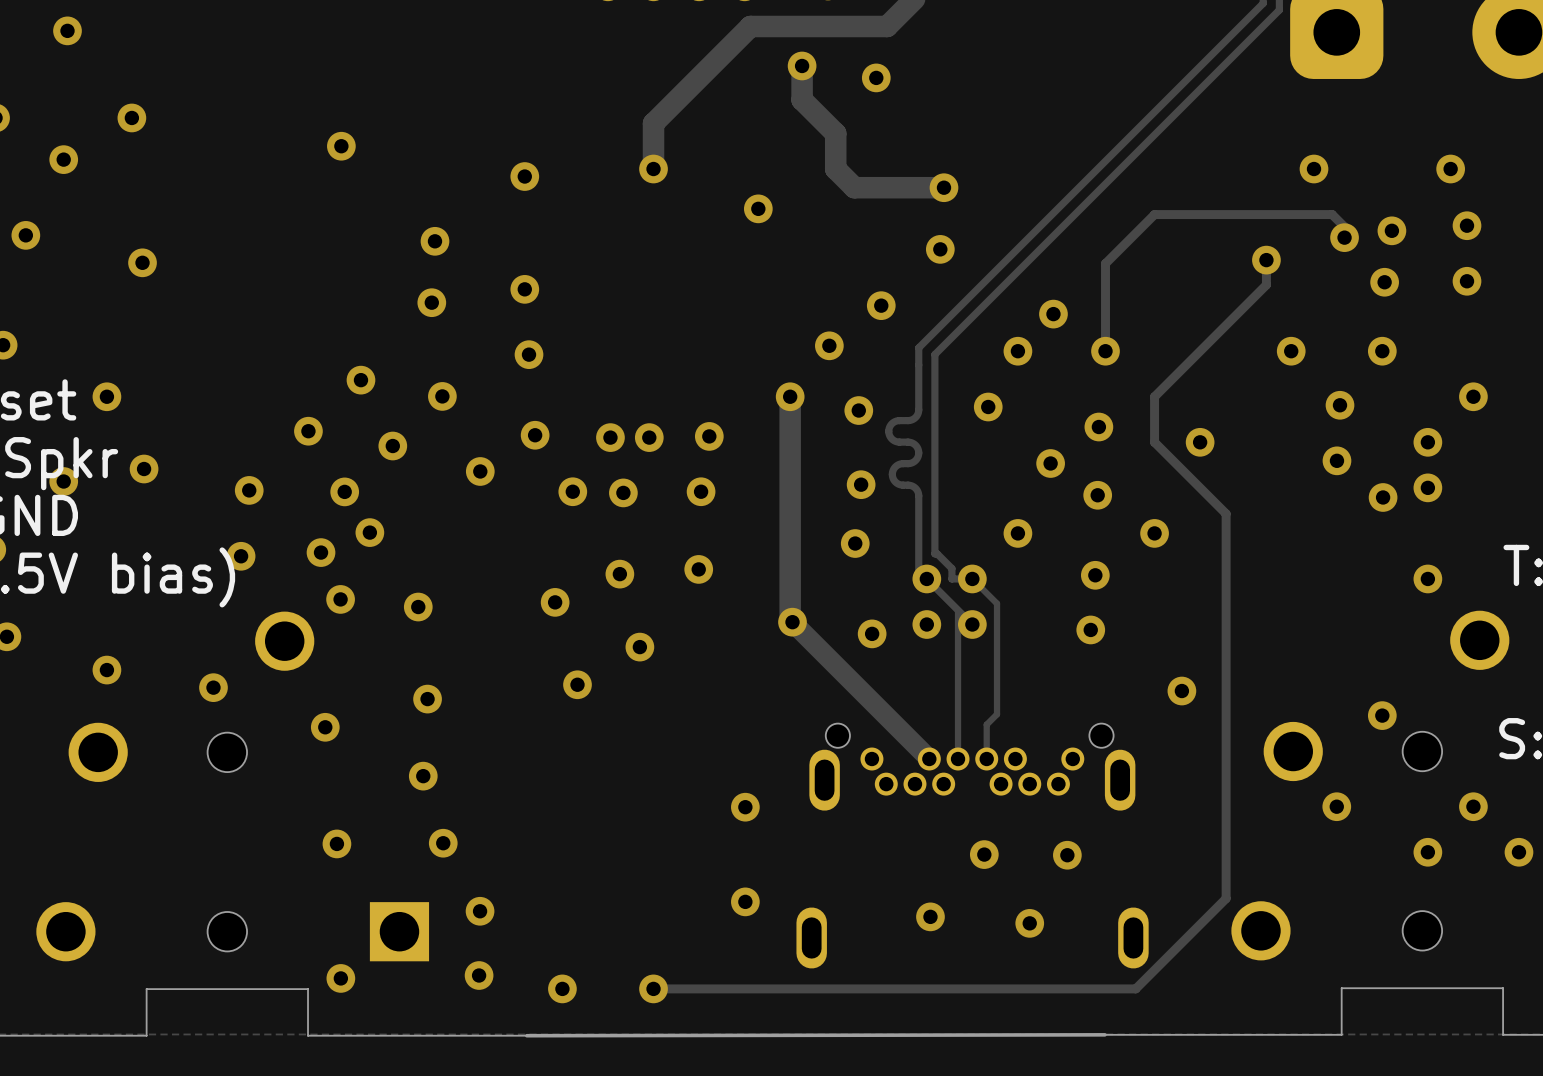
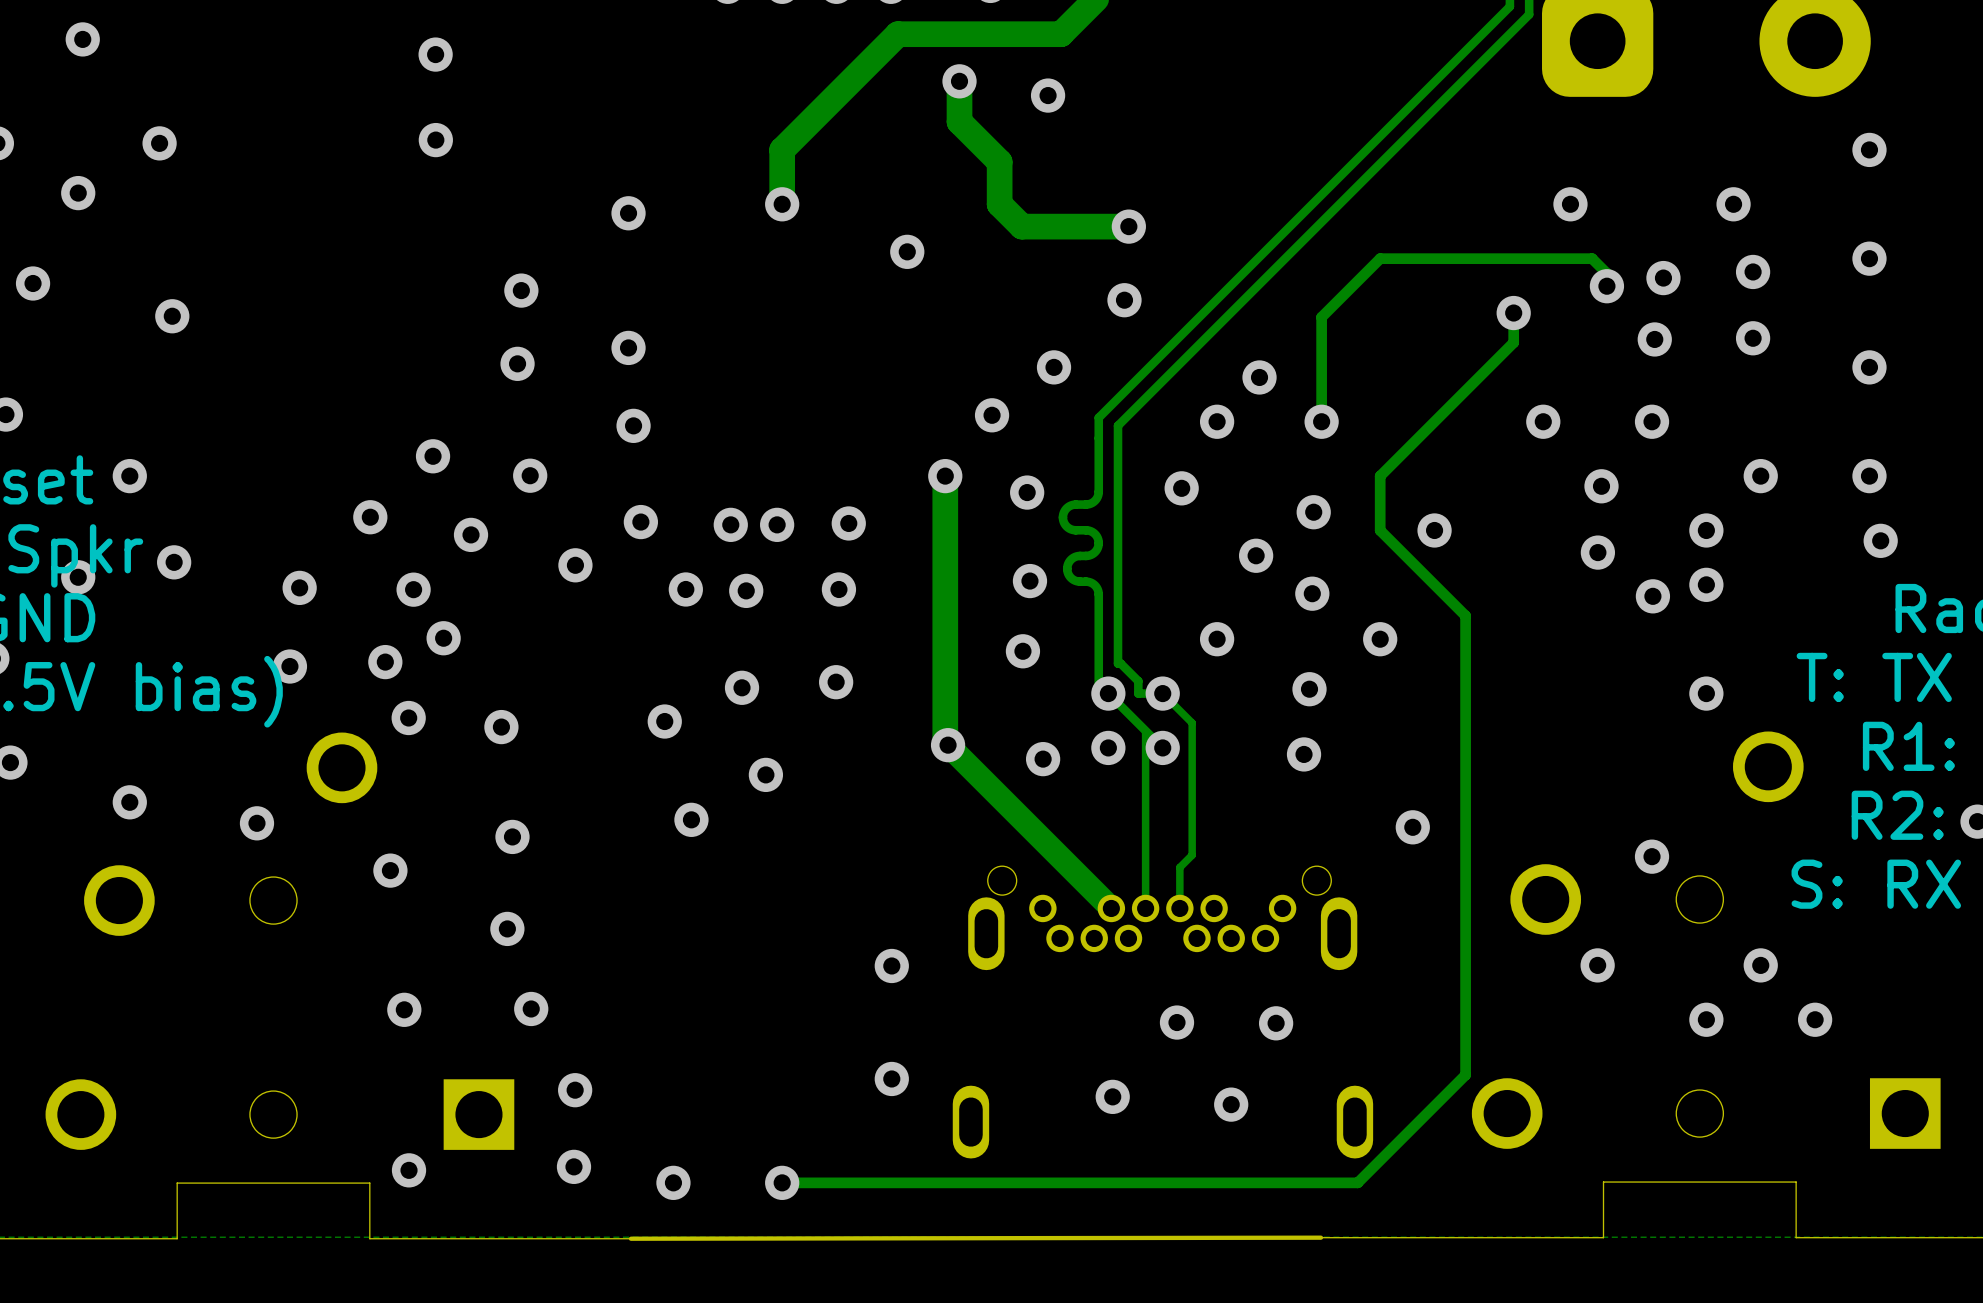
via: none -> (435, 54)
via position: (341, 146) -> (435, 140)

